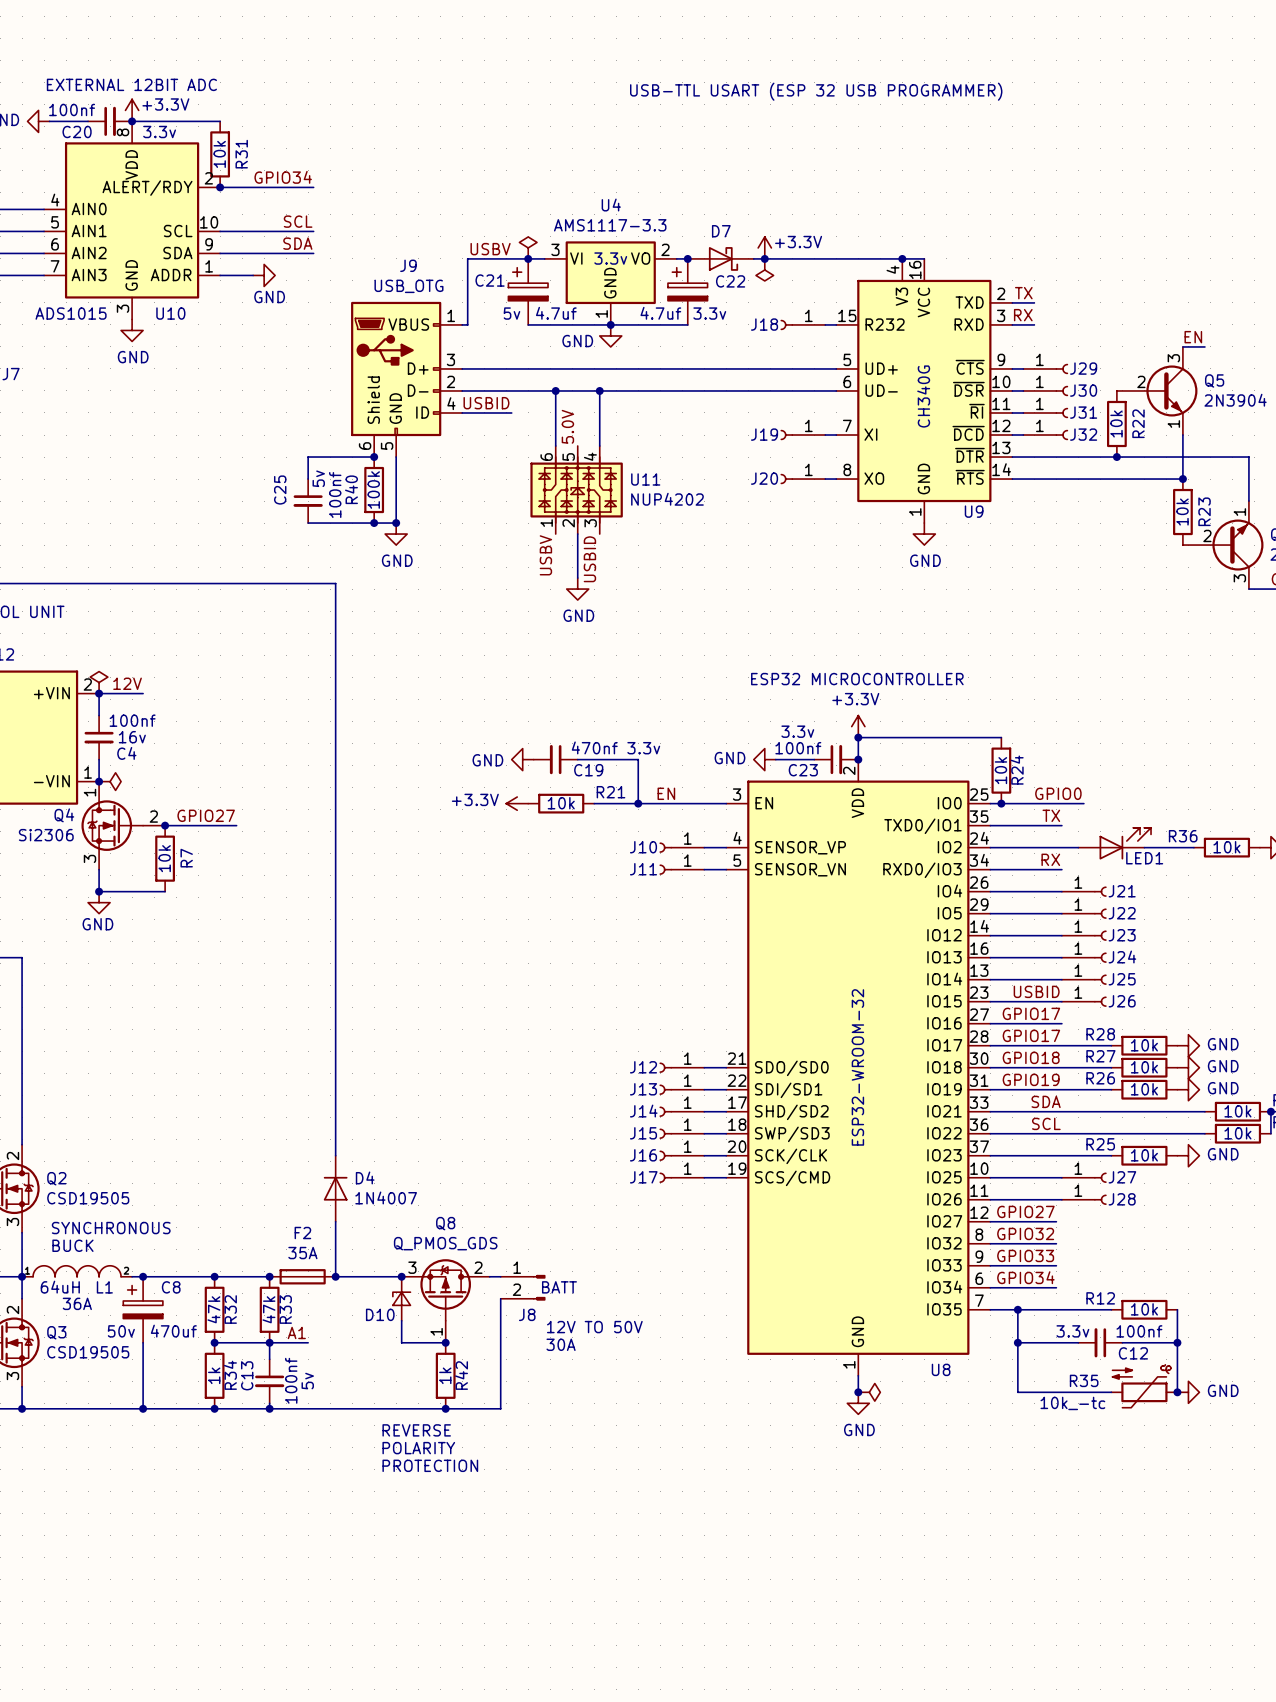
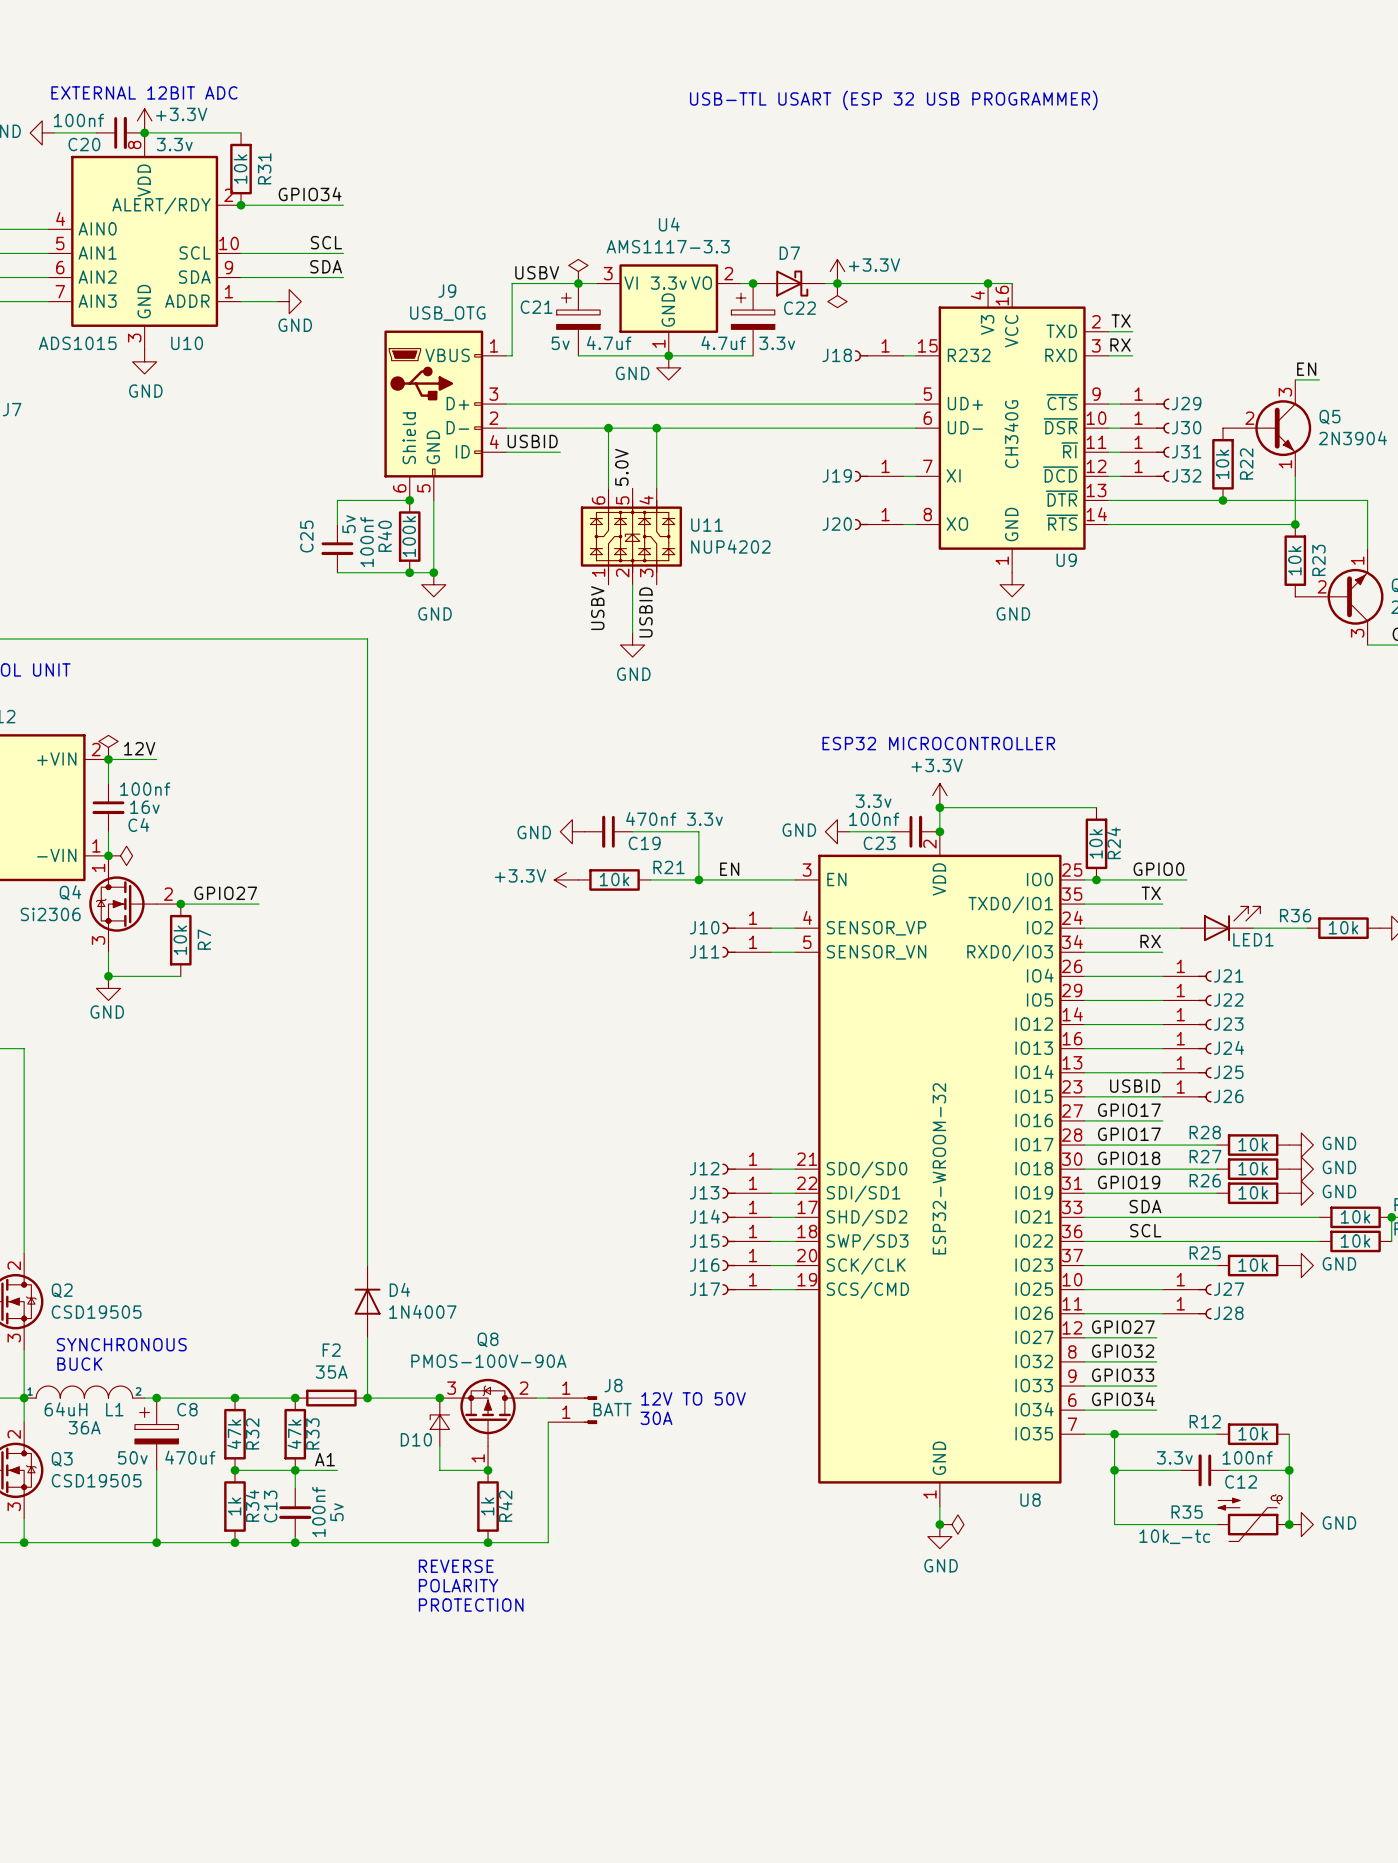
Q8 value: Q_PMOS_GDS (445, 1243) -> PMOS-100V-90A (488, 1361)
J8 symbol: [500, 1275, 546, 1301] -> [548, 1396, 598, 1400]
part: none -> (572, 1422)
J8 name position: J8 (527, 1314) -> J8 (613, 1385)
text position: 12V TO 50V (594, 1327) -> 12V TO 50V (693, 1398)
text position: 30A (561, 1344) -> 30A (656, 1418)

